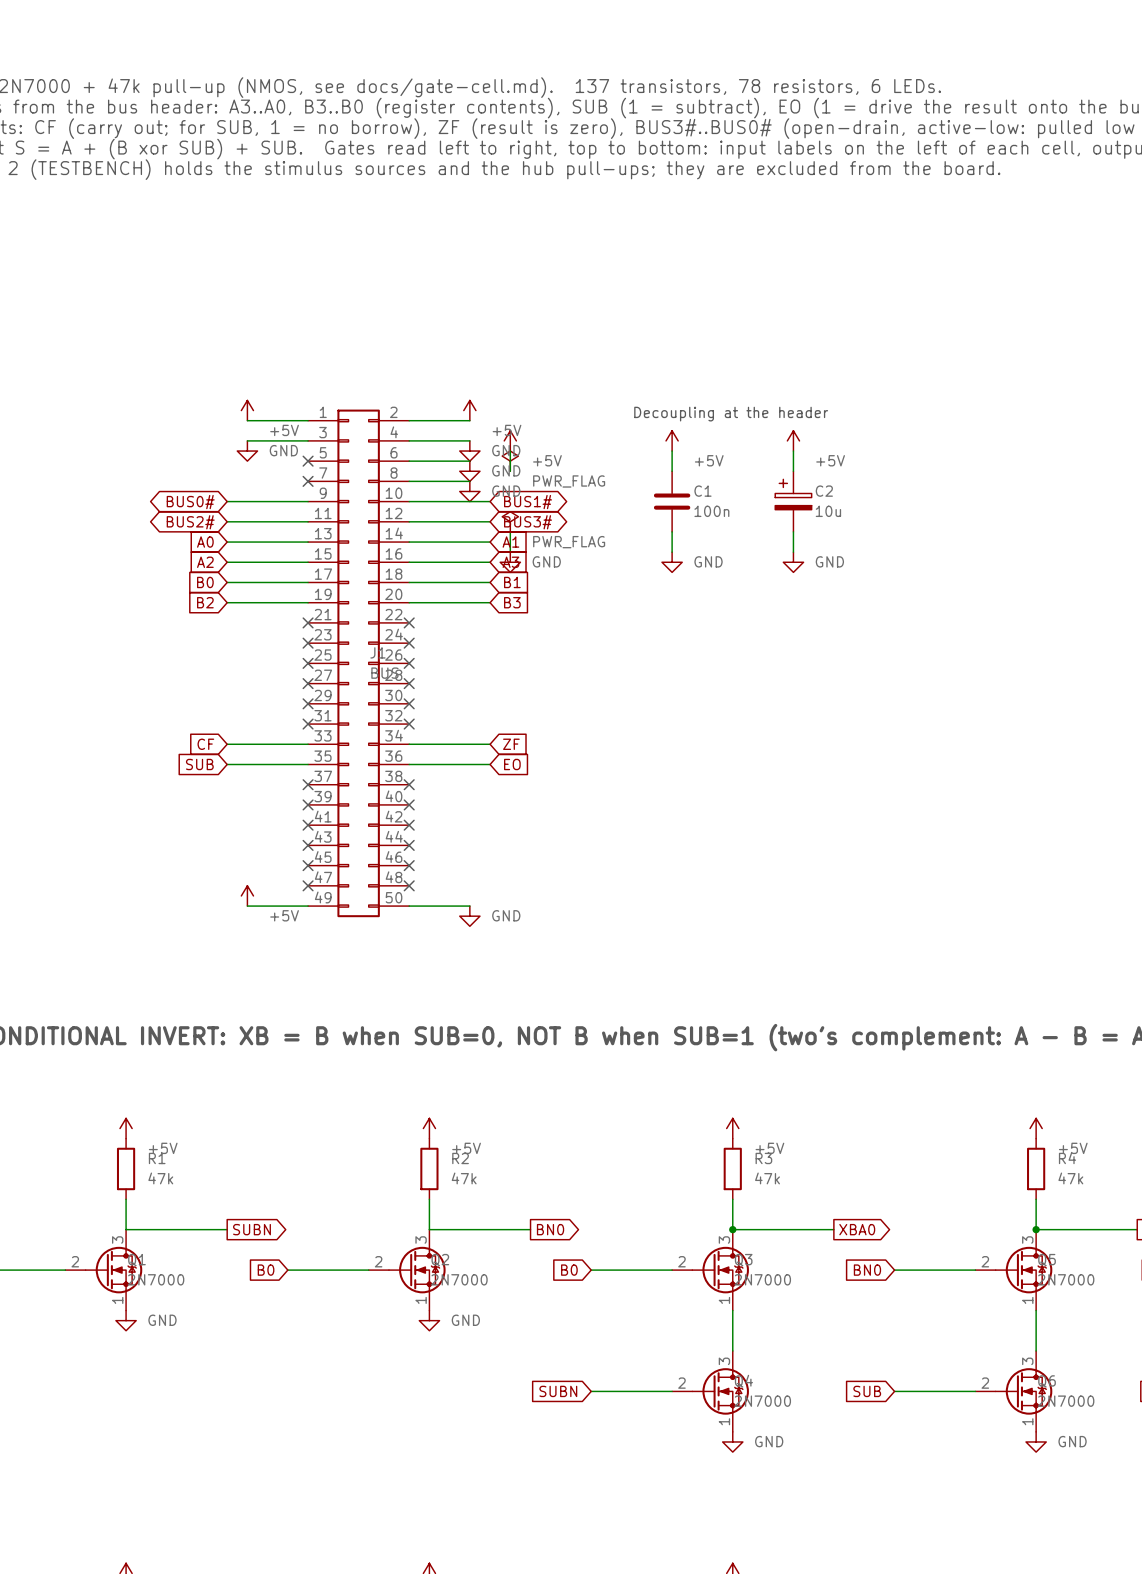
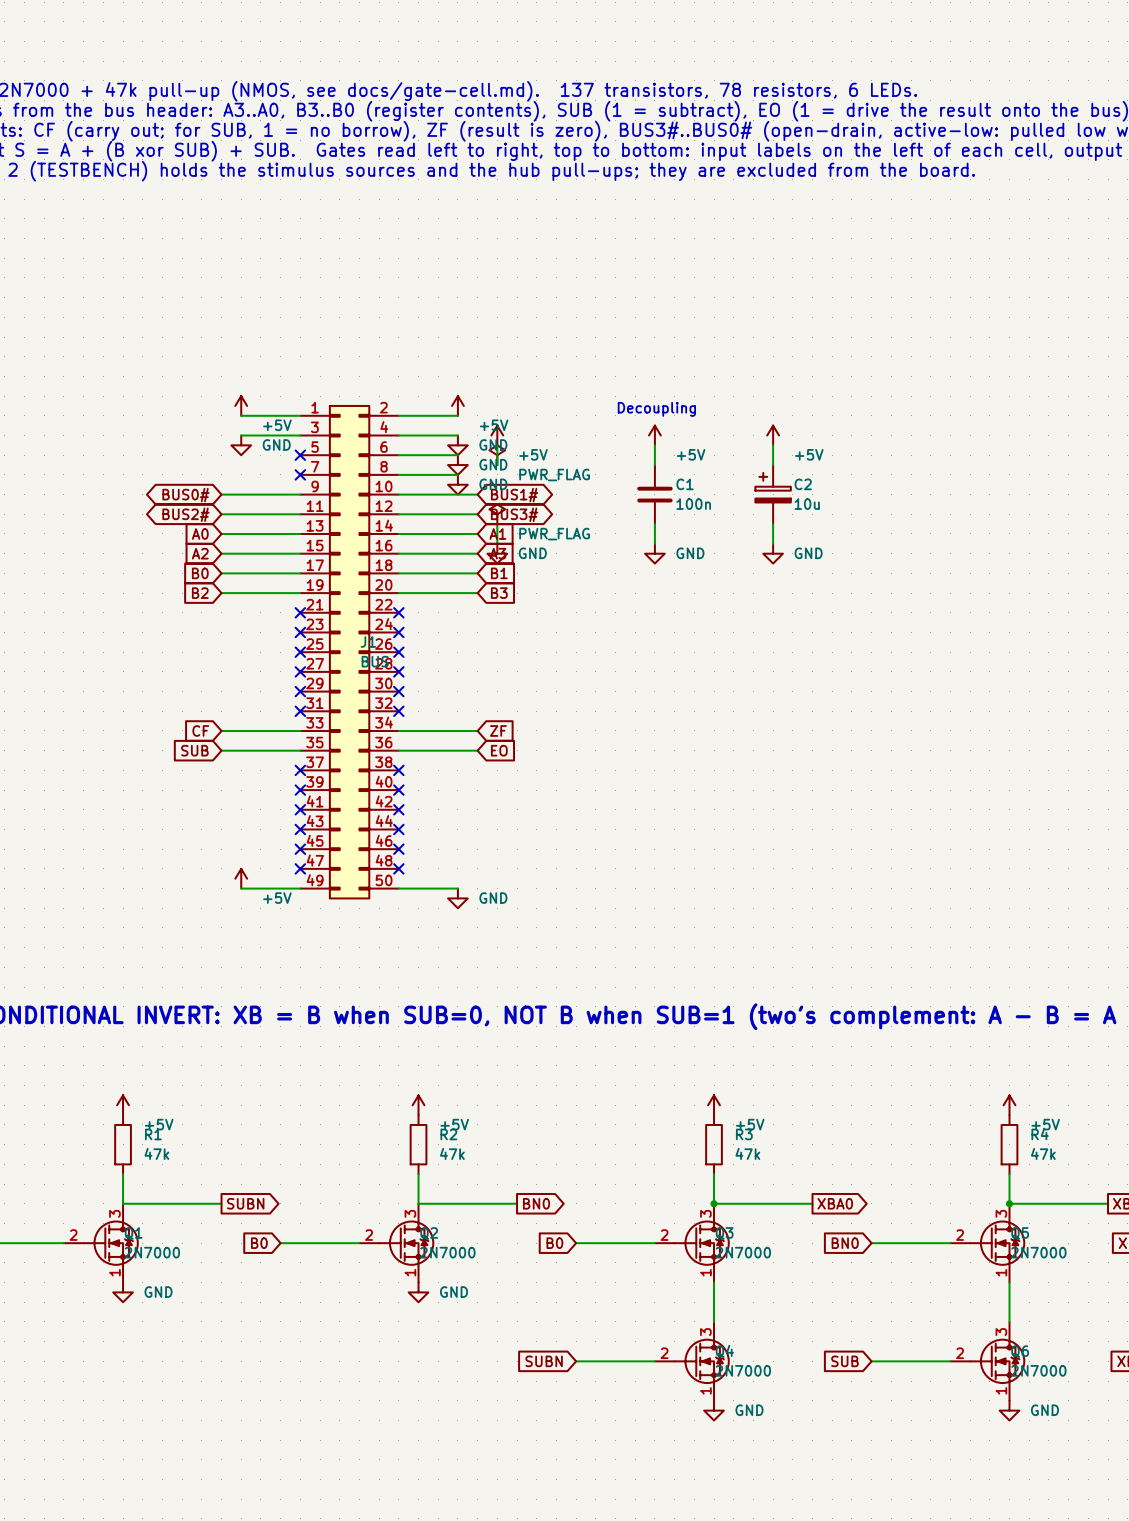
text: Decoupling at the header (731, 414) -> Decoupling (656, 409)

